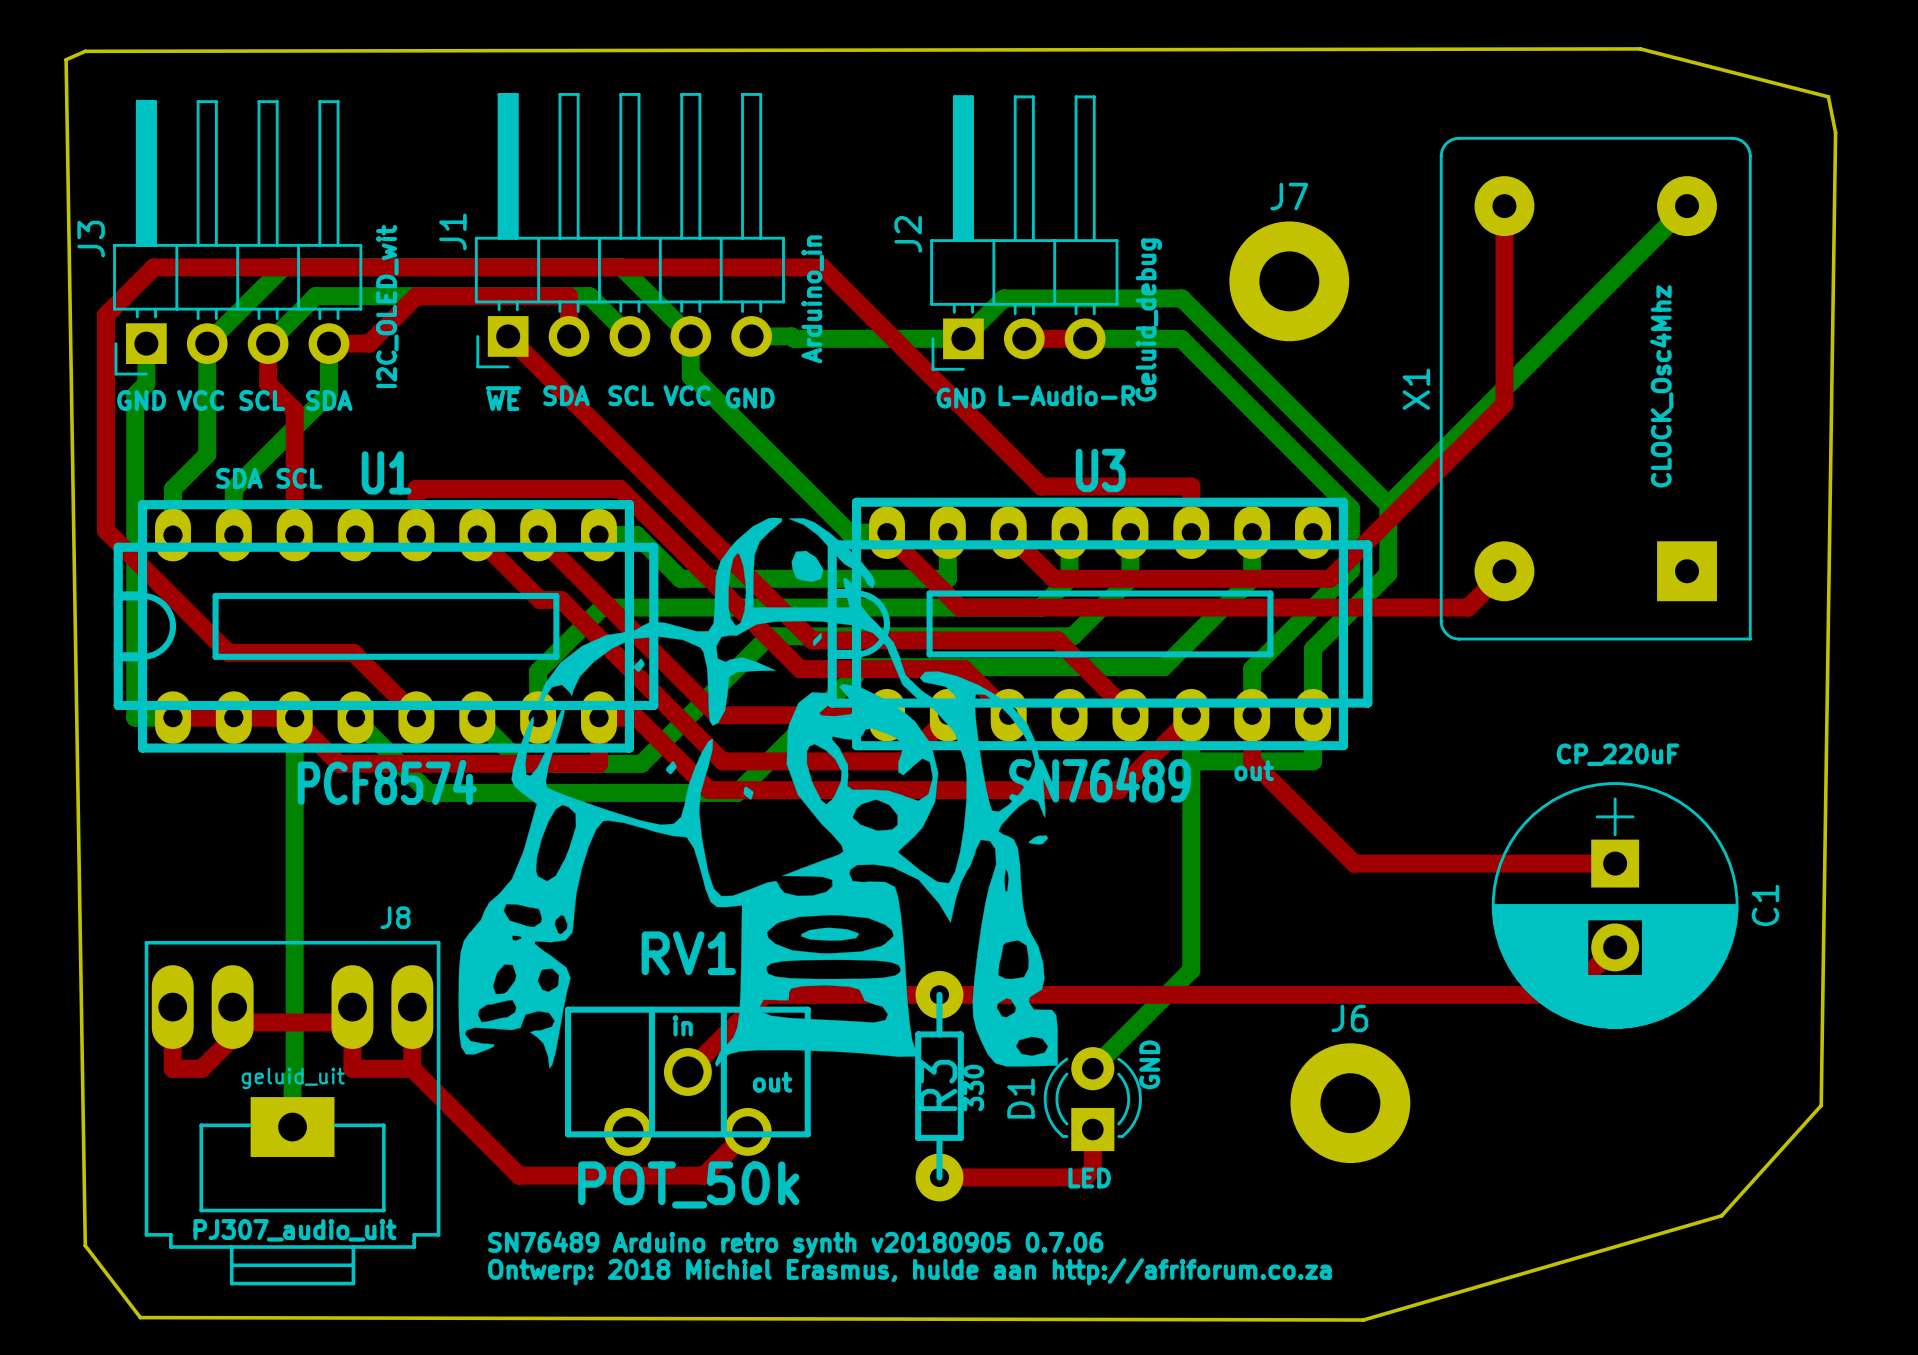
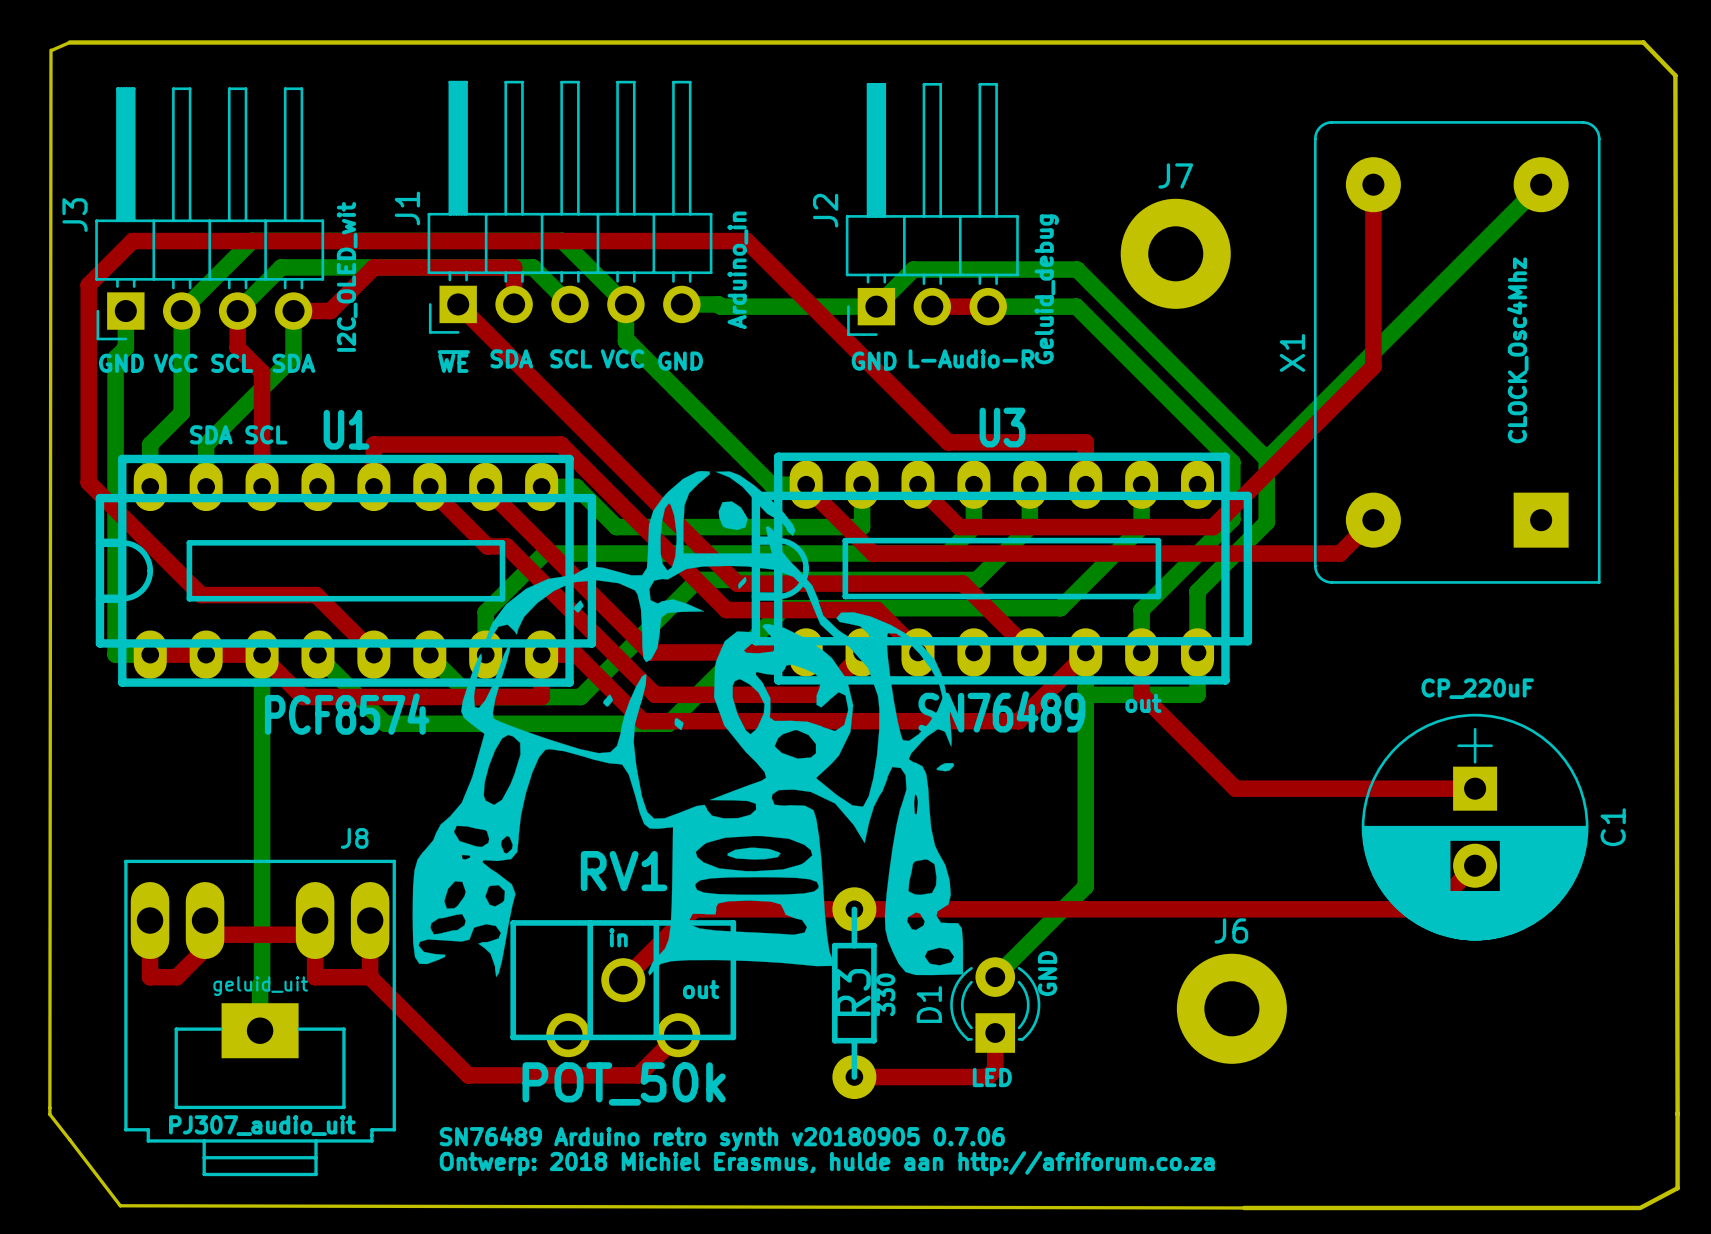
board edge: (85, 51) (1640, 48) (1828, 96) (1835, 132) (1821, 1105) (1721, 1215) (1363, 1320) -> (69, 42) (1643, 42) (1675, 75) (1677, 1114)
board edge: (66, 59) (85, 1245) -> (50, 50) (49, 1114) (69, 1139)
board edge: none -> (1677, 1113) (1677, 1188) (1640, 1207)
board edge: none -> (1243, 1207) (1639, 1207)

